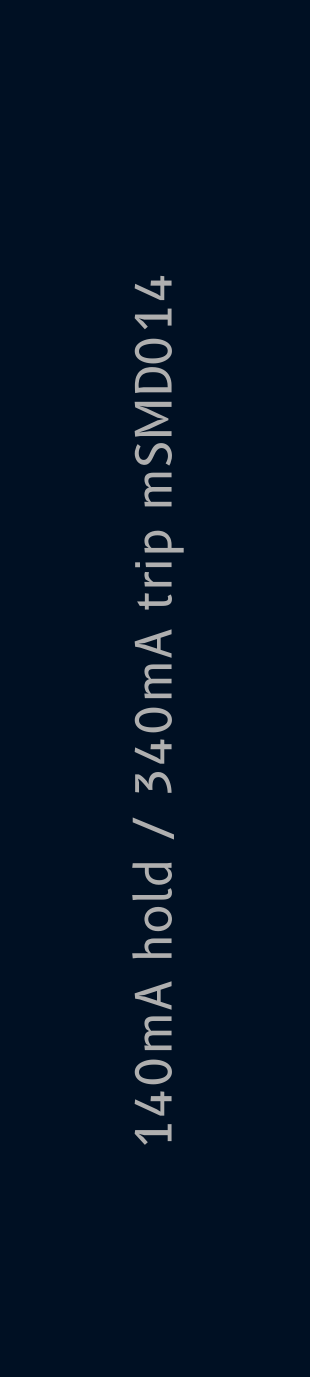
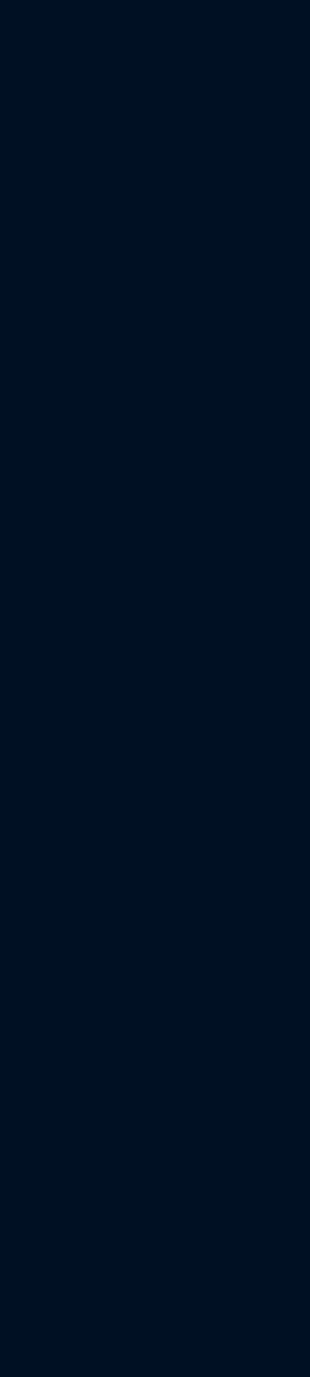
text: 140mA hold / 340mA trip mSMD014 (157, 710) -> none

